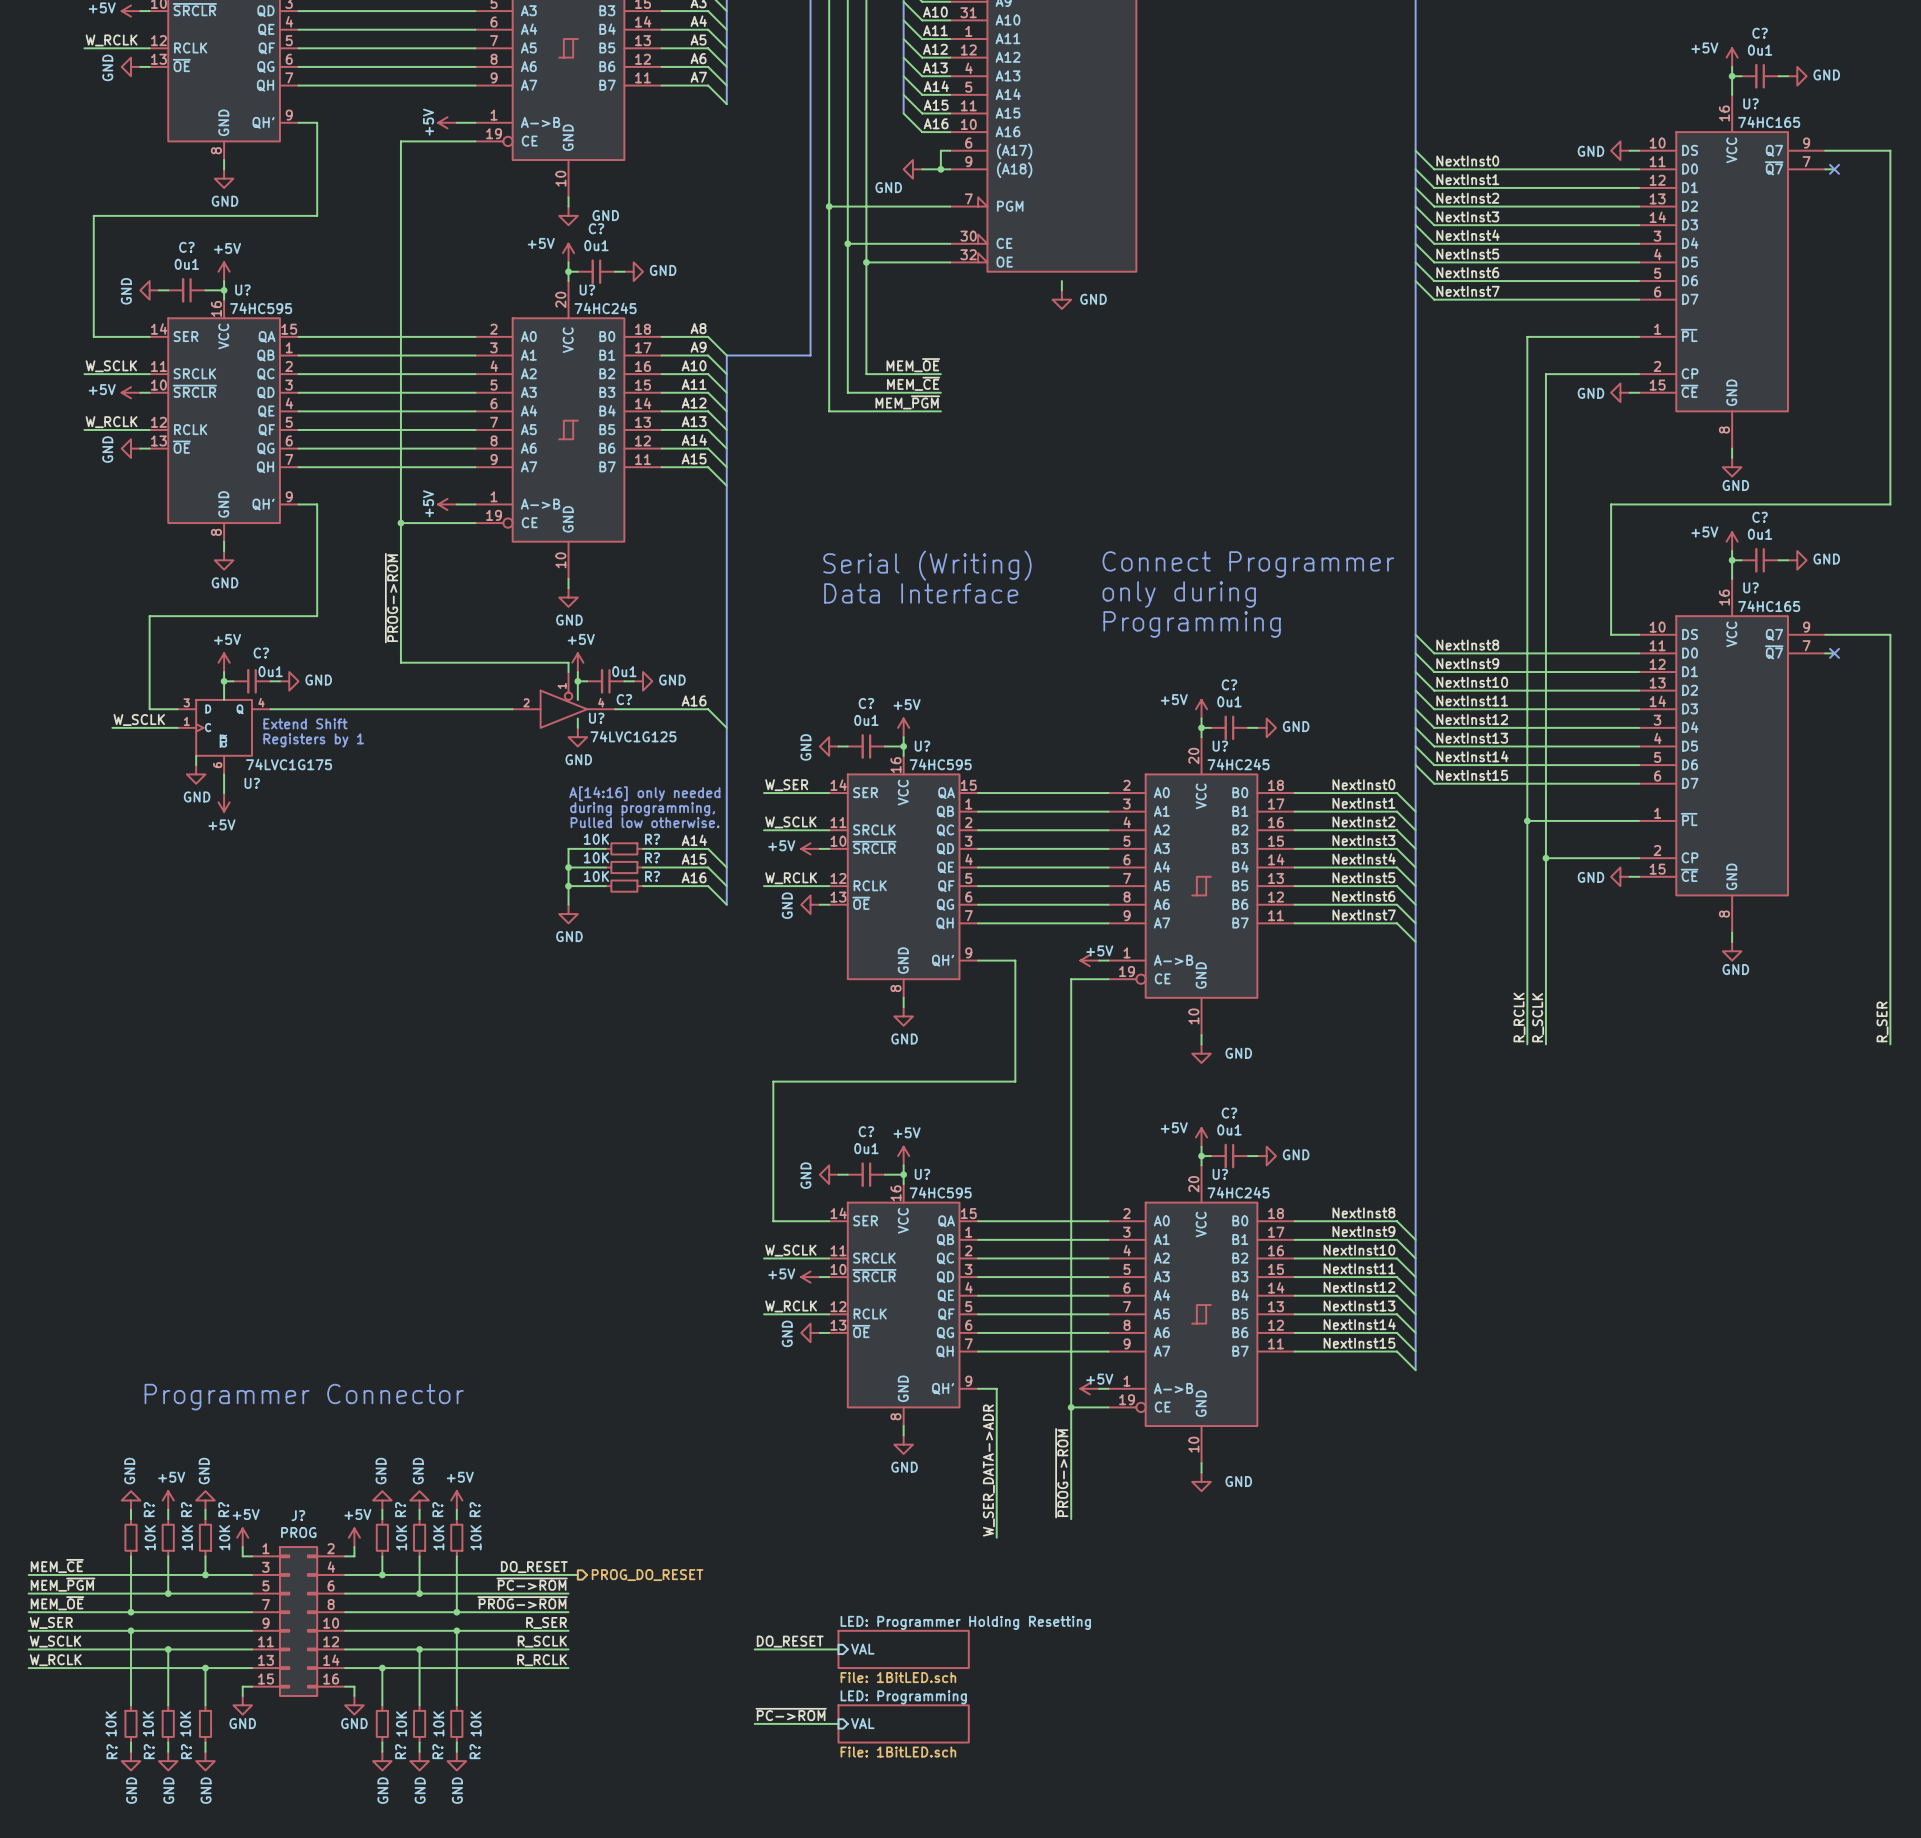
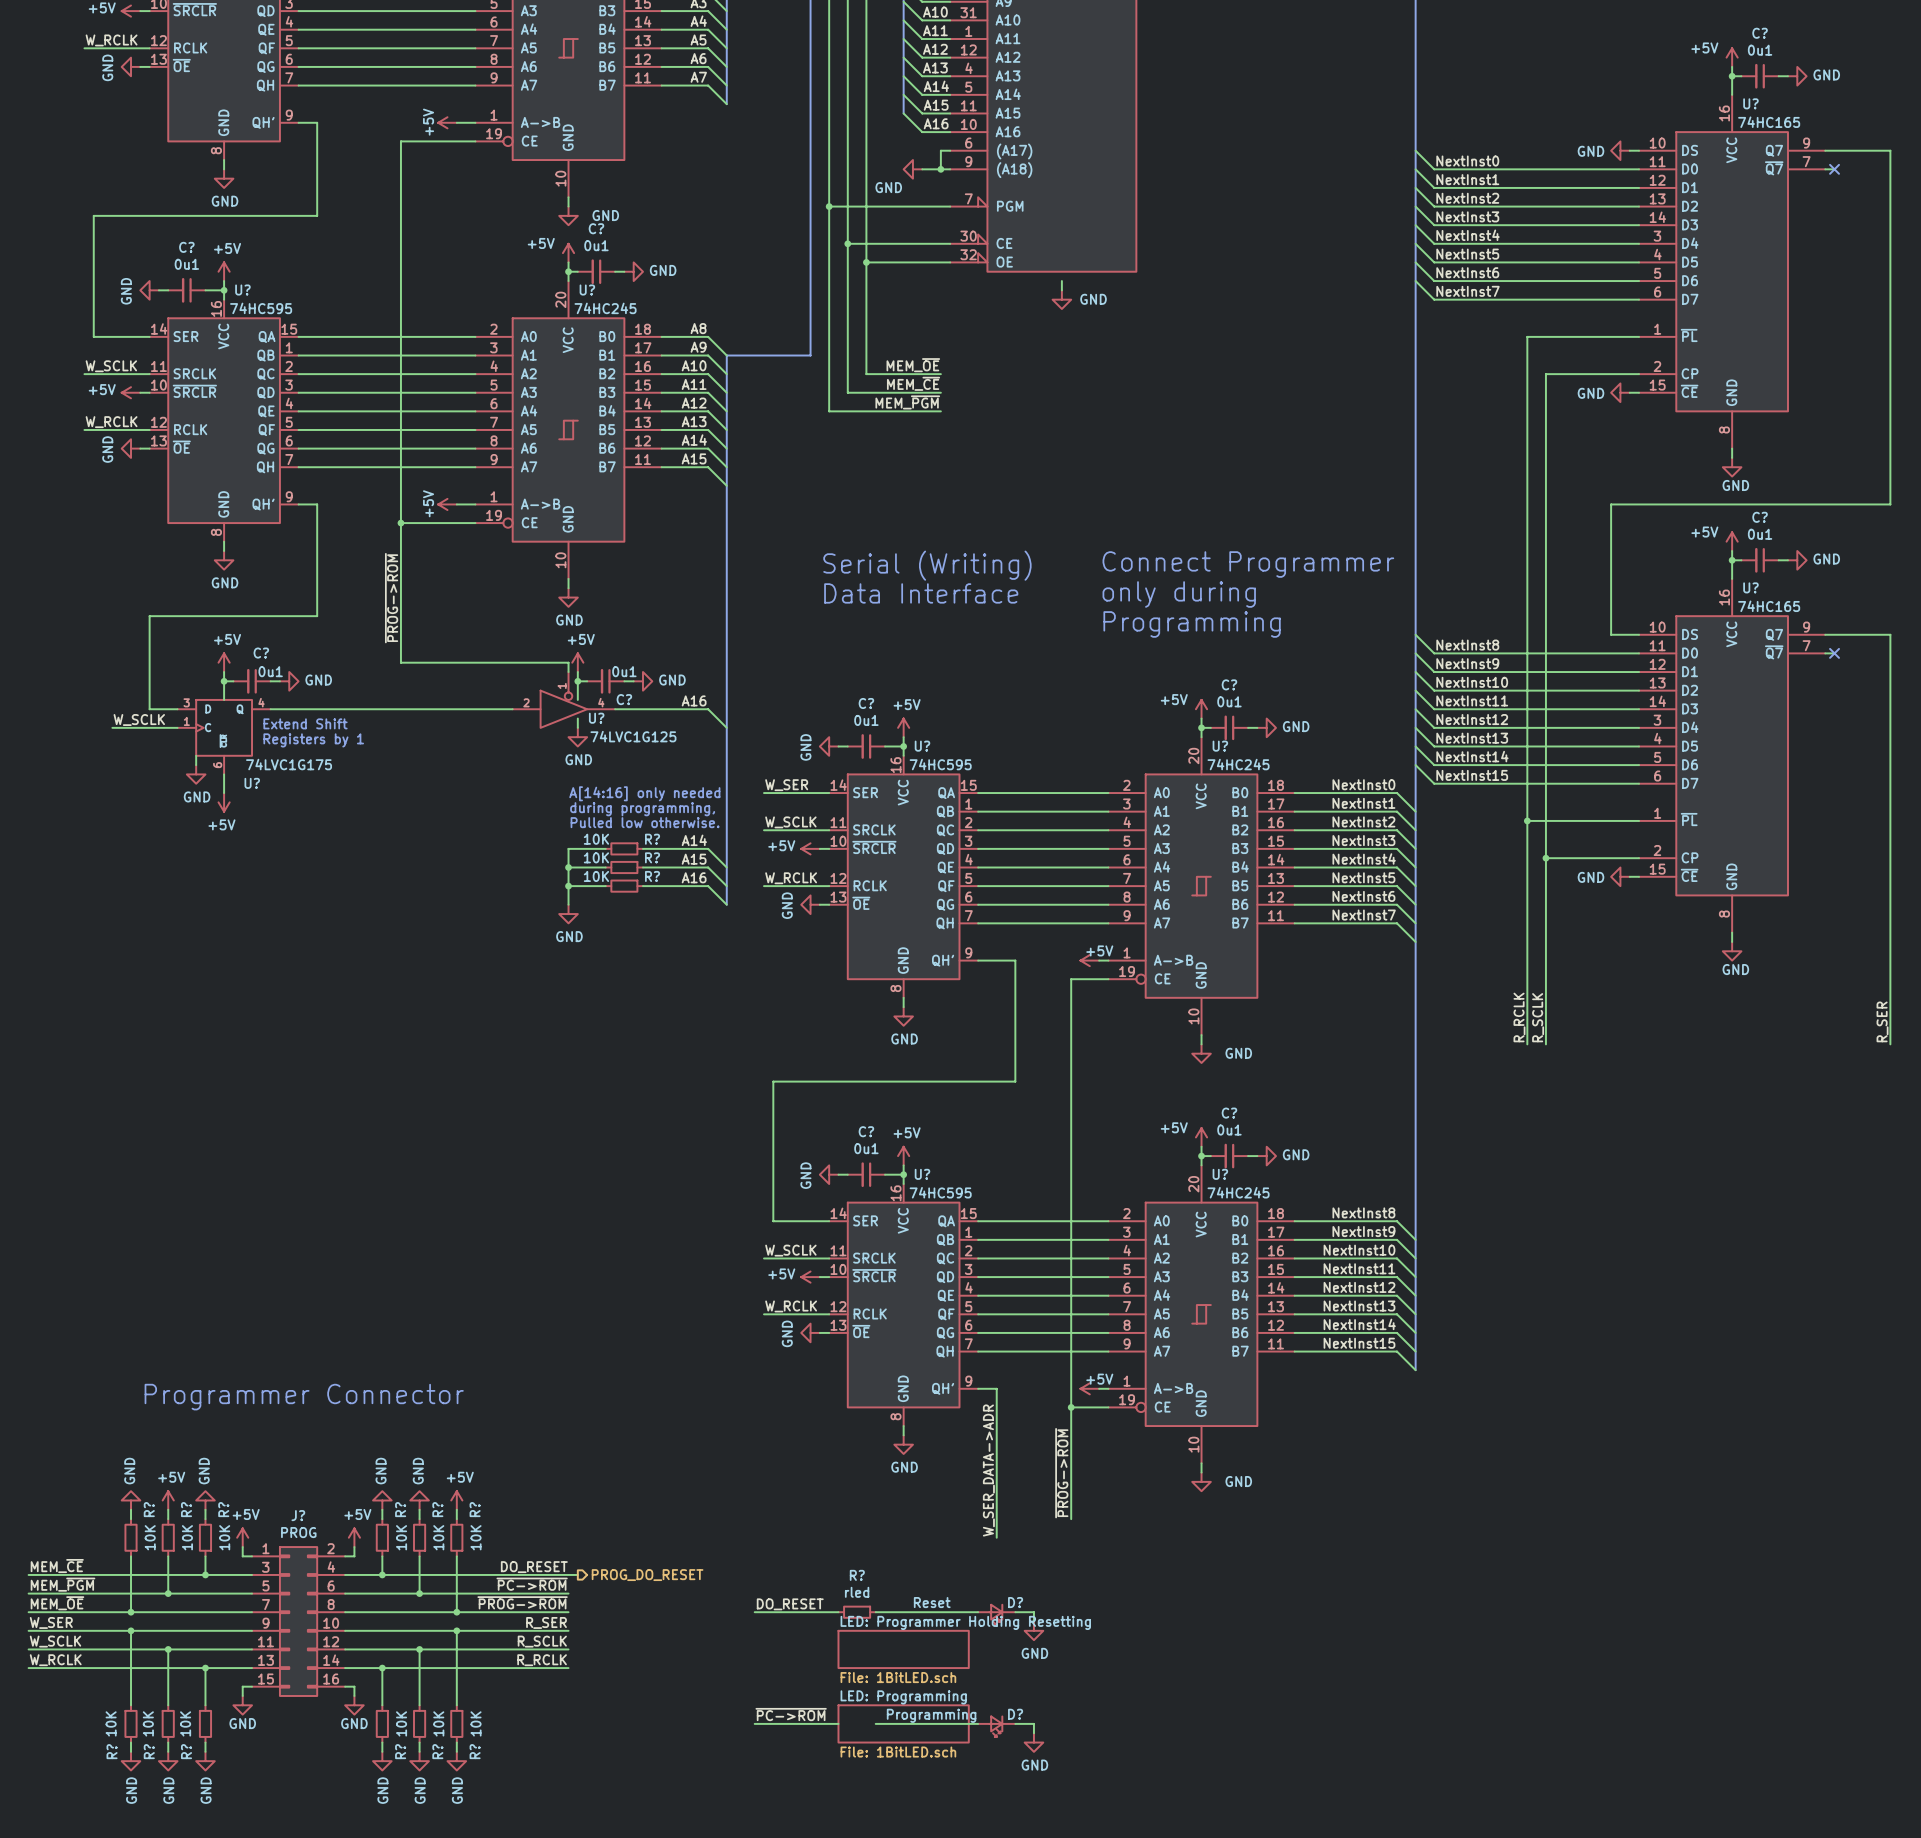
R?: none -> rled (857, 1612)
wire: none -> (875, 1612) (978, 1612)
wire: none -> (1015, 1612) (1033, 1612) (1033, 1621)
D?: none -> Reset (996, 1614)
power symbol: none -> GND (1033, 1630)
label position: DO_RESET (790, 1641) -> DO_RESET (790, 1604)
wire: (754, 1649) (838, 1649) -> (754, 1612) (838, 1612)
sheet pin: VAL (862, 1649) -> none
sheet pin: VAL (862, 1723) -> none
wire: none -> (875, 1723) (978, 1723)
wire: none -> (1015, 1723) (1033, 1723) (1033, 1733)
D?: none -> Programming (996, 1726)
power symbol: none -> GND (1033, 1742)

